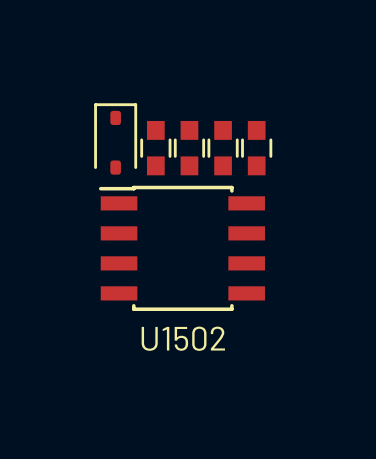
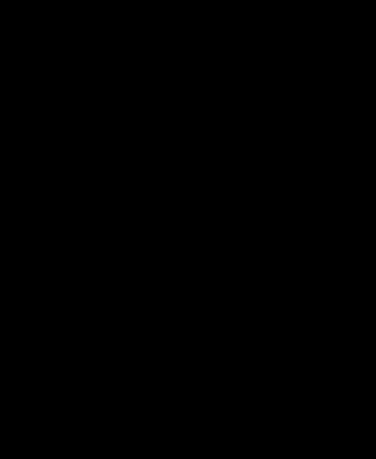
part: (115, 138) -> none
part: (155, 148) -> none
part: (189, 148) -> none
part: (223, 148) -> none
part: (256, 148) -> none
U1502: (181, 248) -> none

